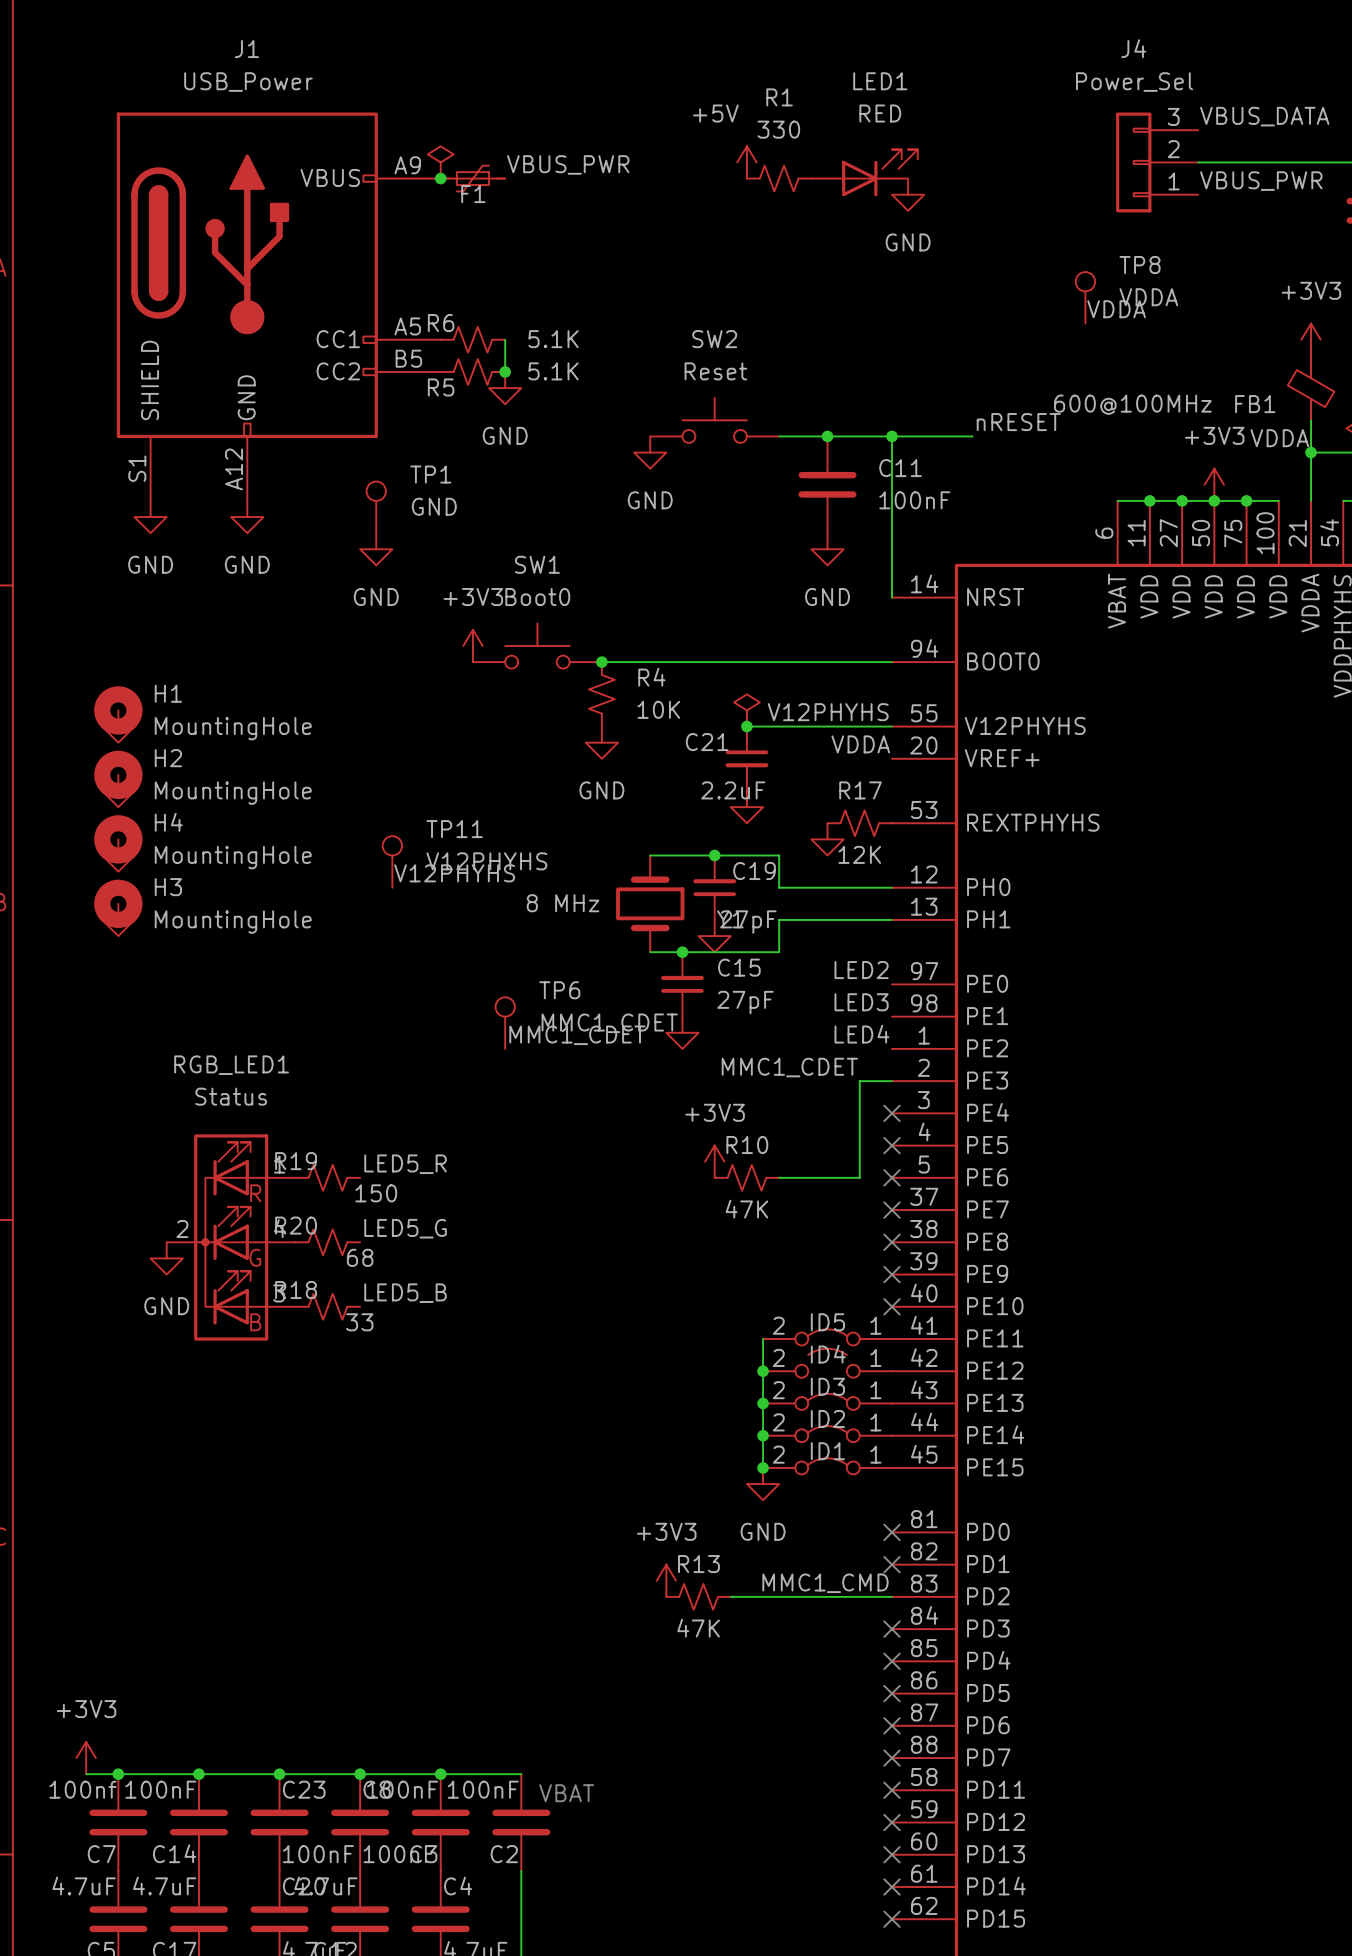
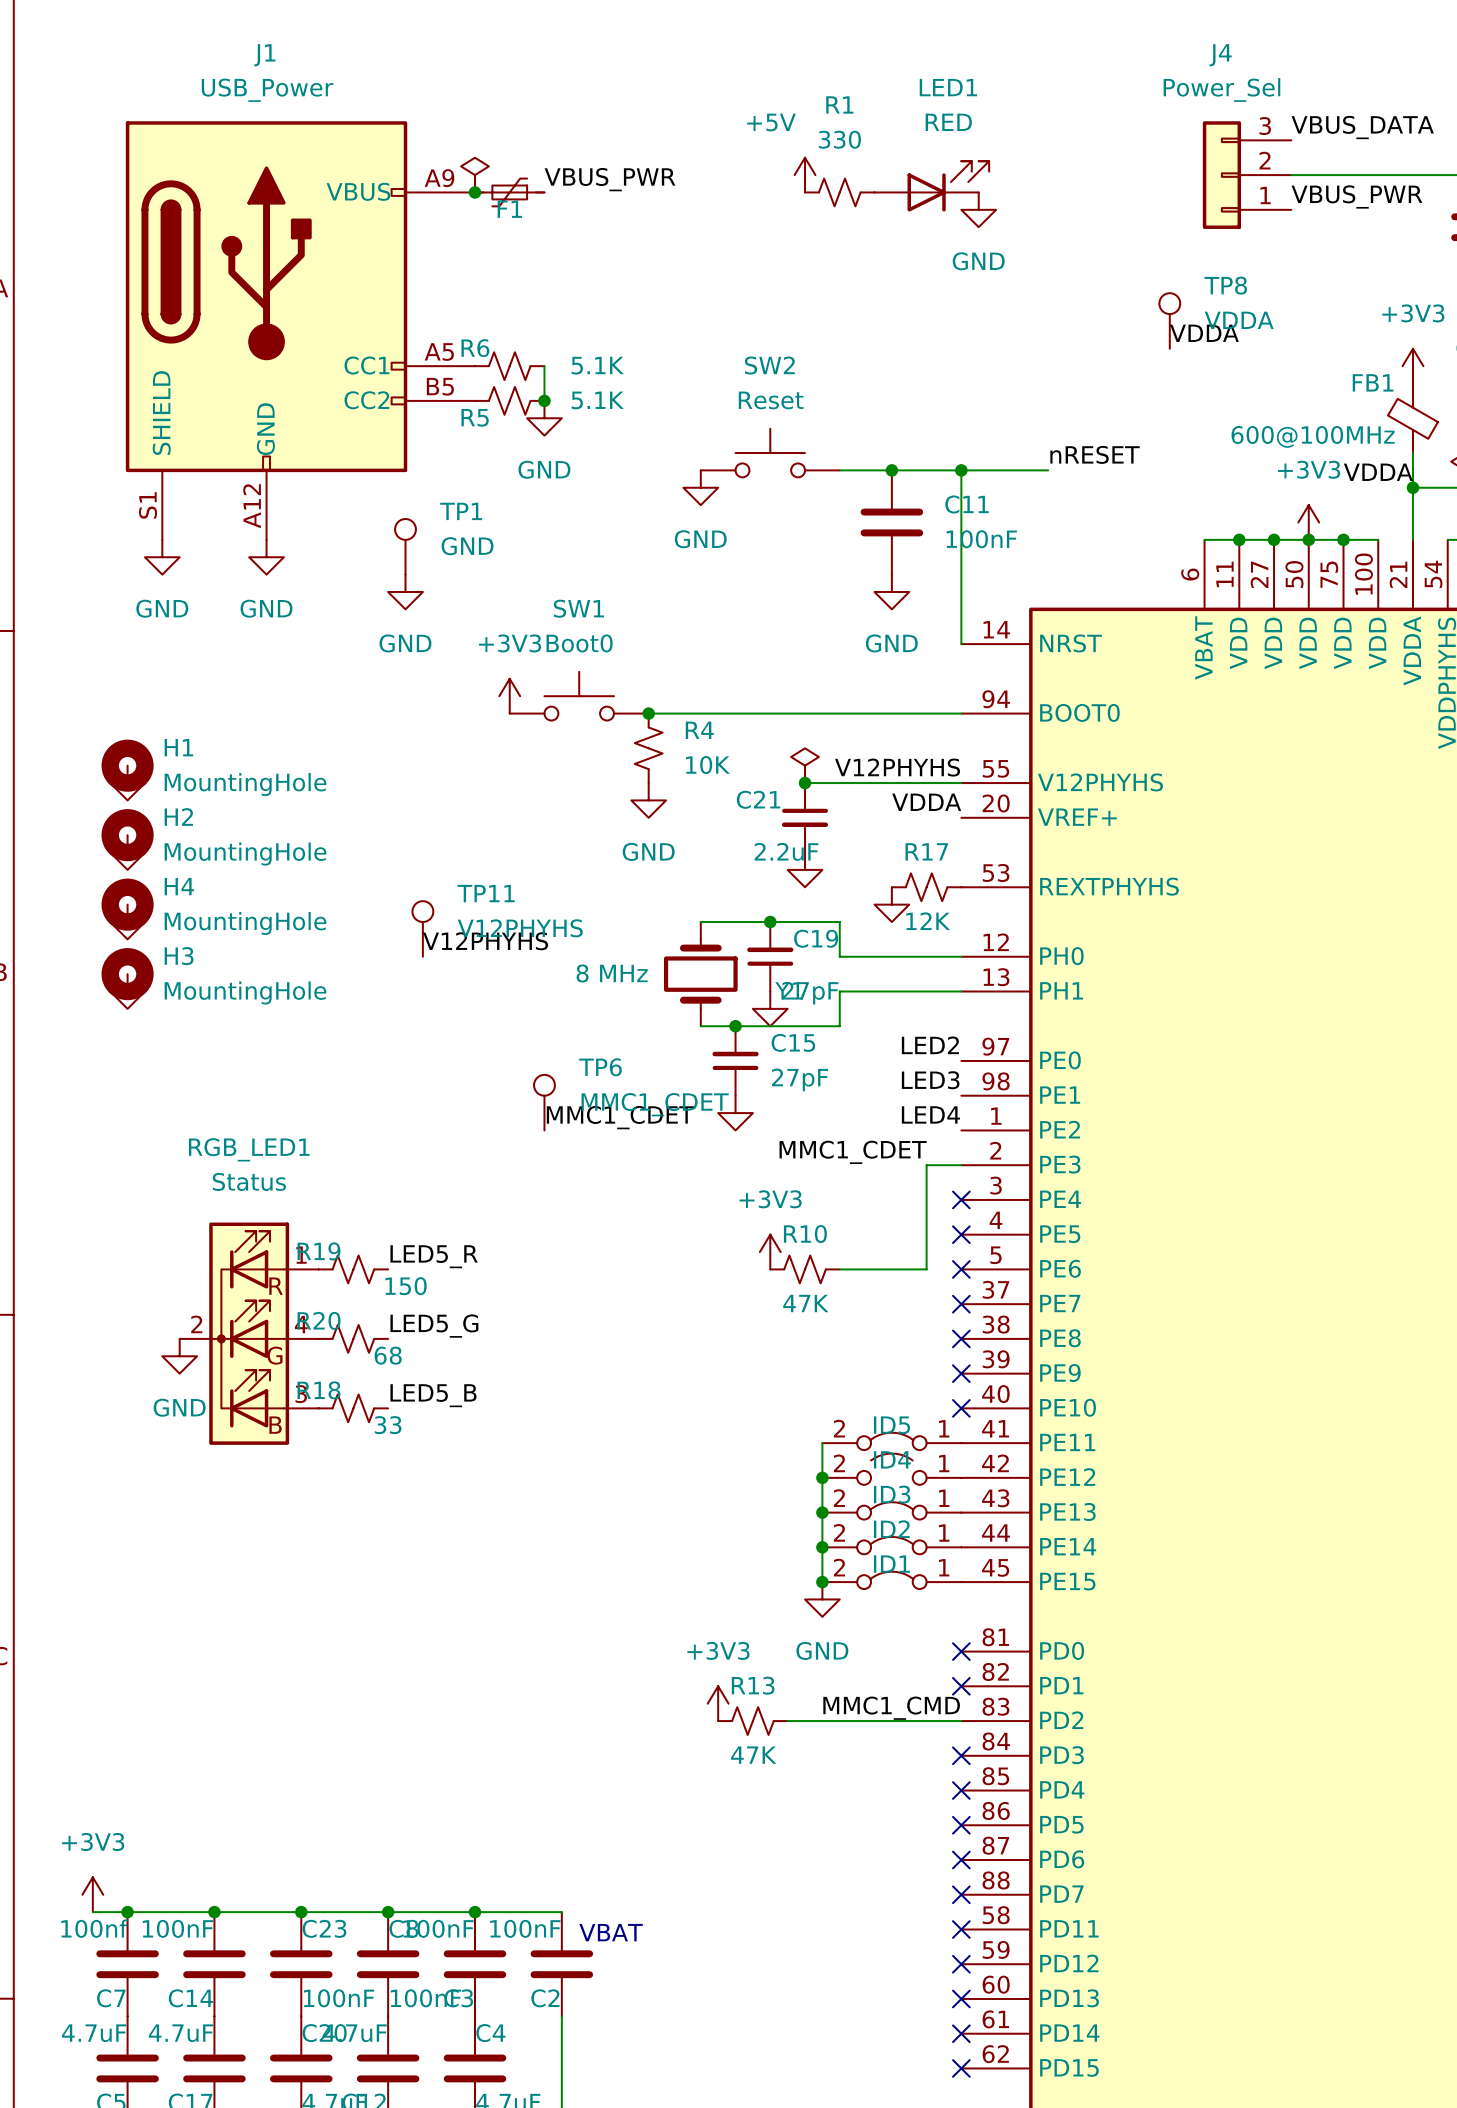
FB1 value position: 600@100MHz (1132, 404) -> 600@100MHz (1313, 436)
FB1 name position: FB1 (1255, 404) -> FB1 (1373, 382)

